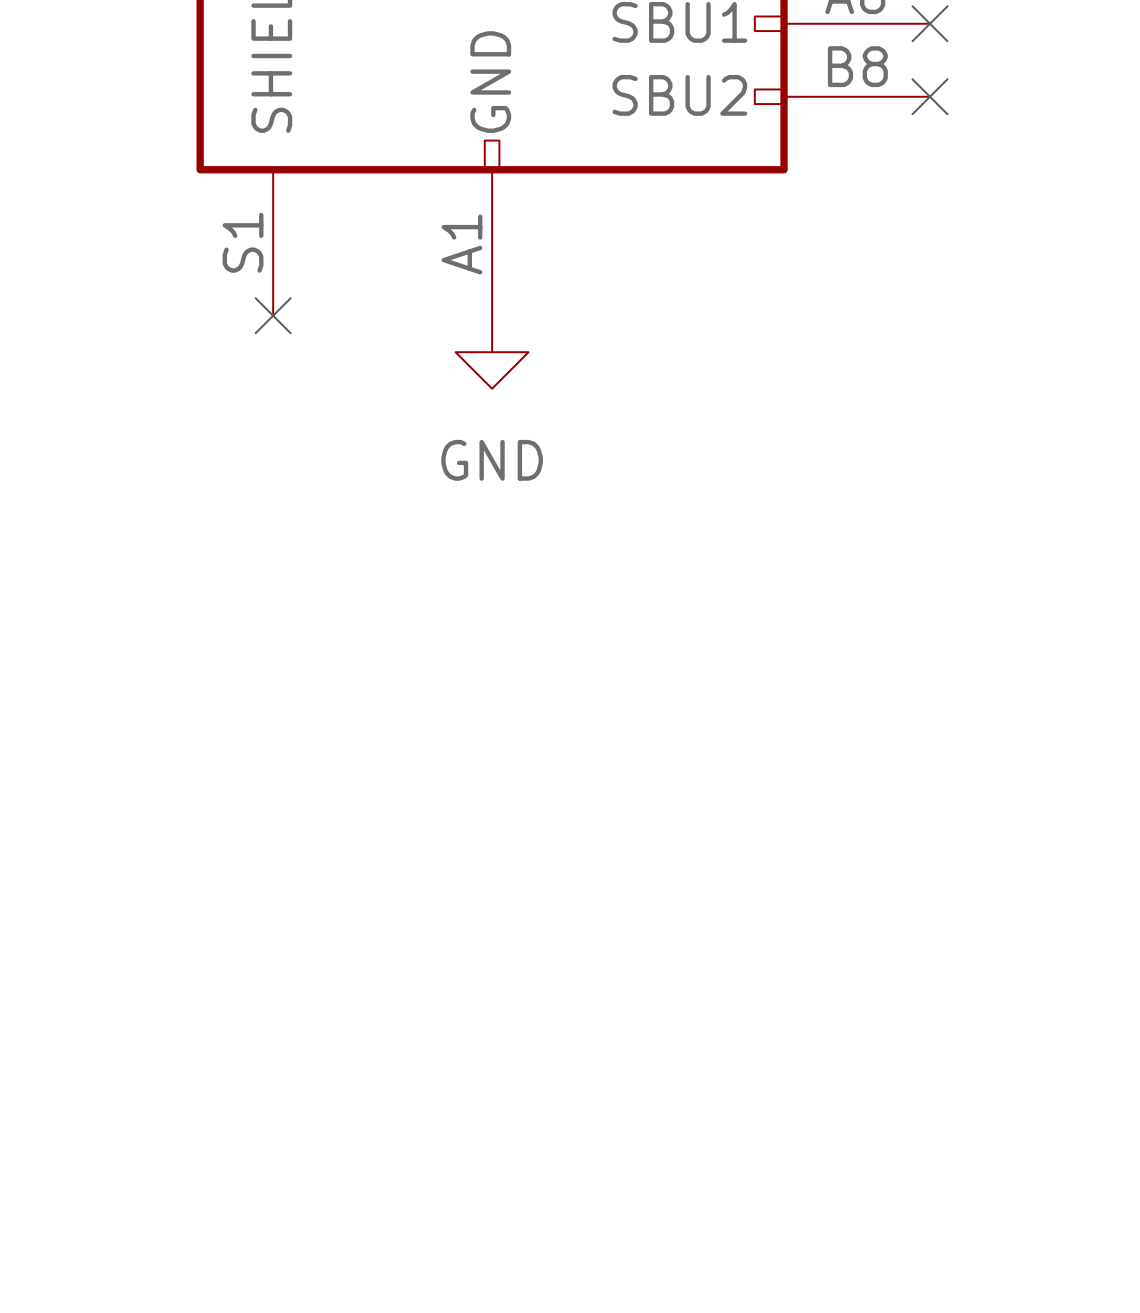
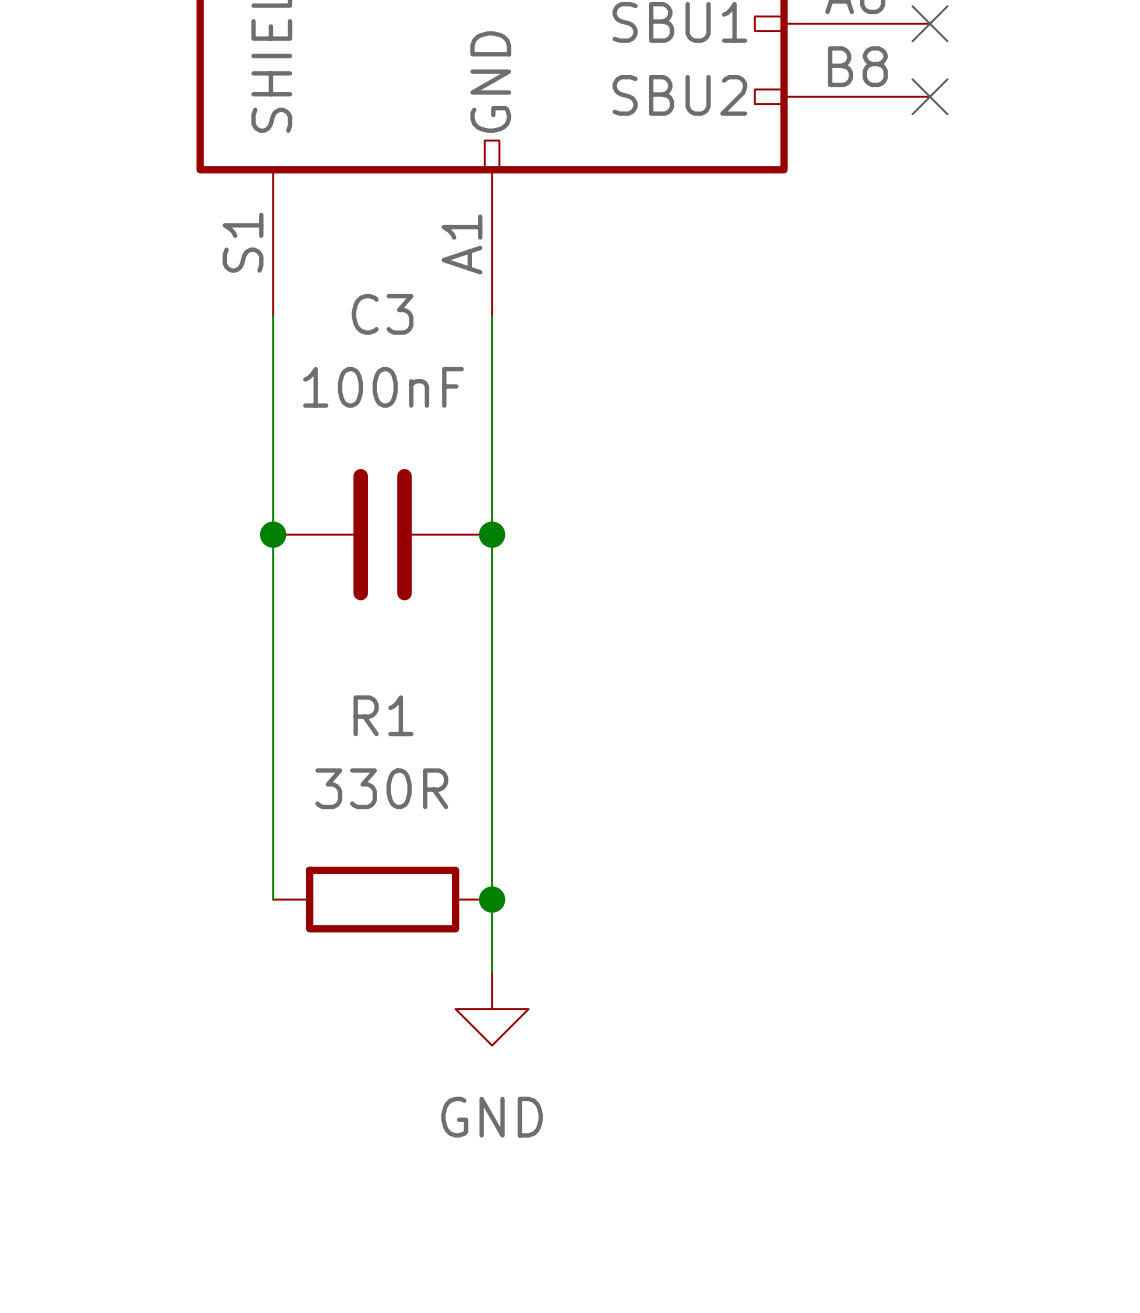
wire: none -> (273, 315) (273, 899)
no-connect mark: (273, 315) -> none
wire: none -> (492, 315) (492, 972)
power symbol position: GND (492, 352) -> GND (492, 1009)
junction: none -> (273, 534)
C3: none -> 100nF (382, 534)
junction: none -> (492, 534)
R1: none -> 330R (382, 899)
junction: none -> (492, 899)

